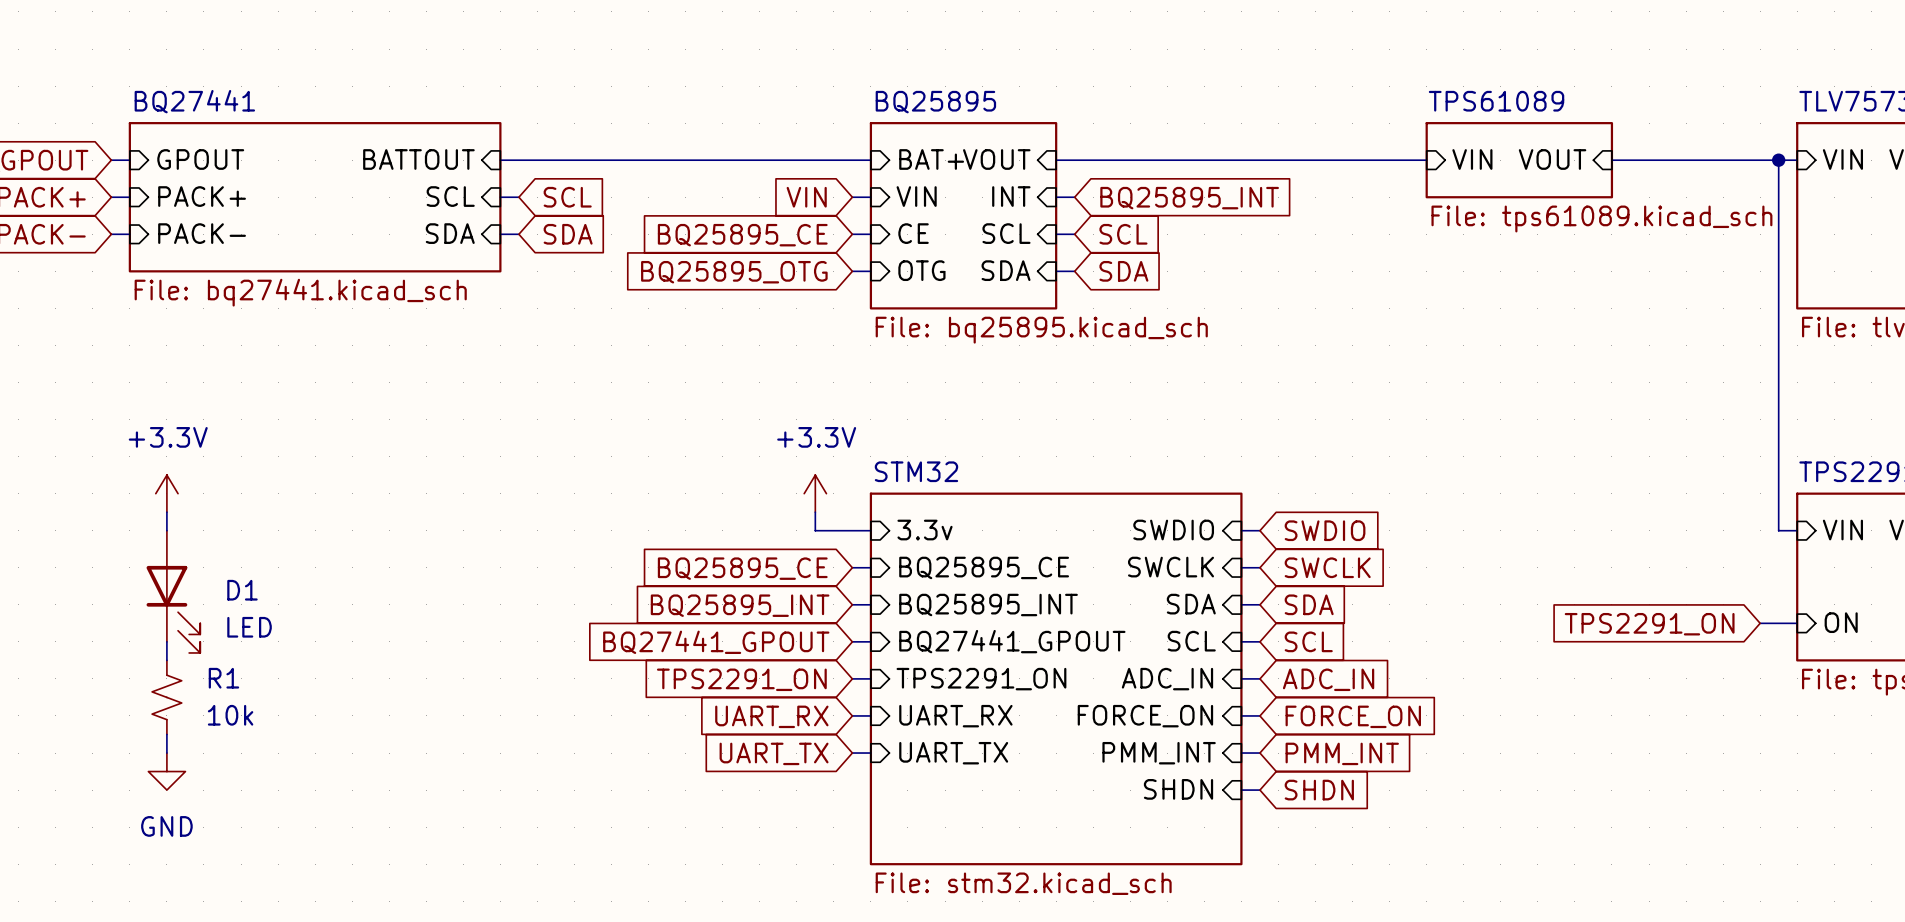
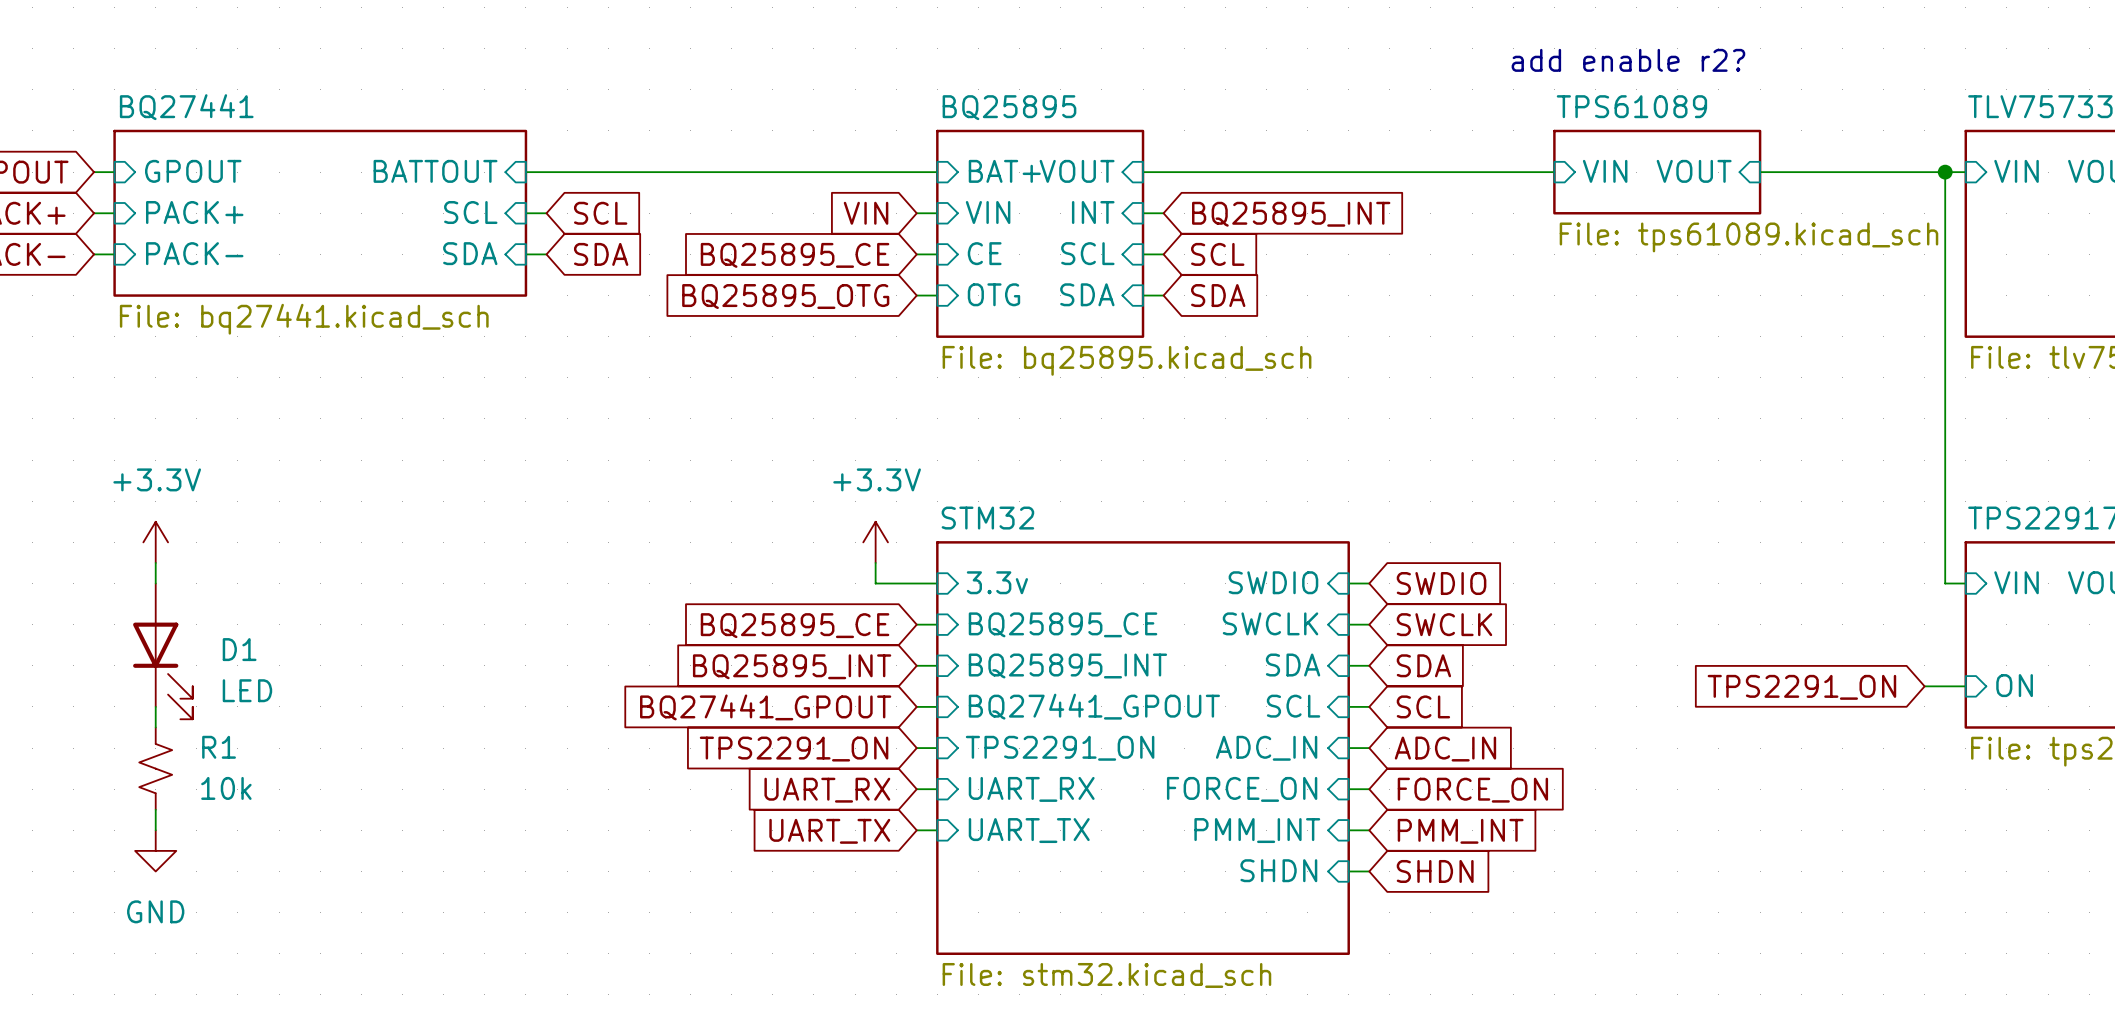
text: none -> add enable r2? (1628, 60)

